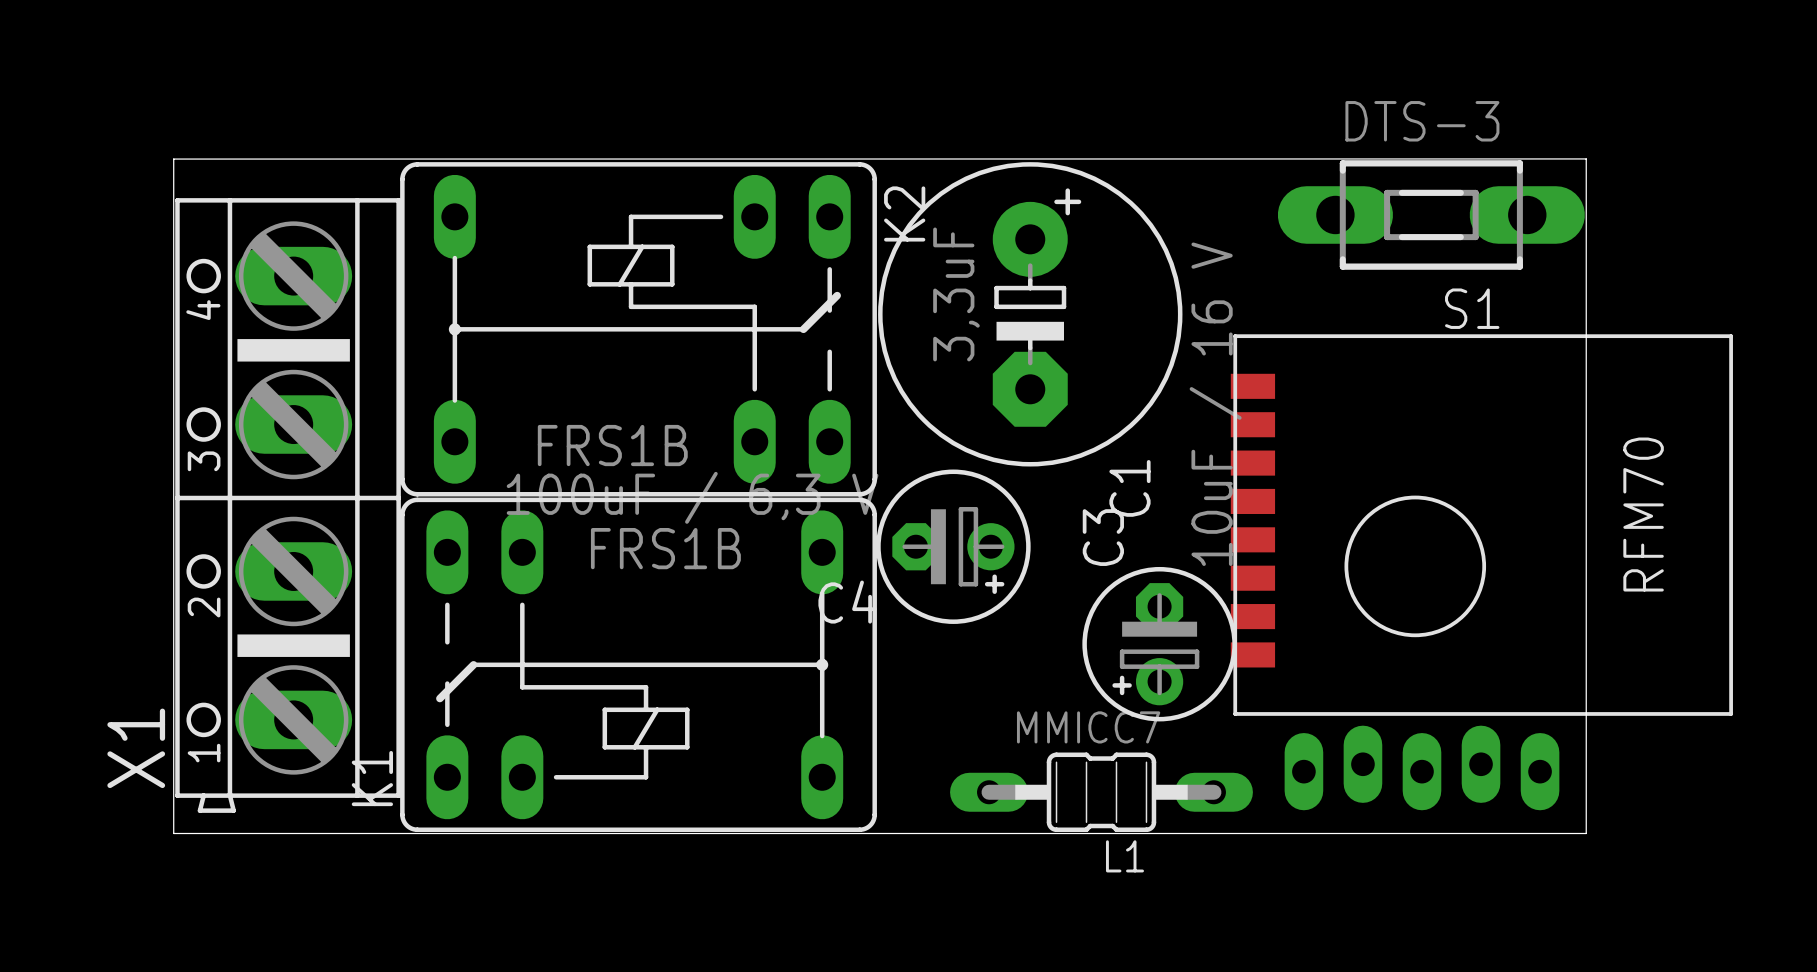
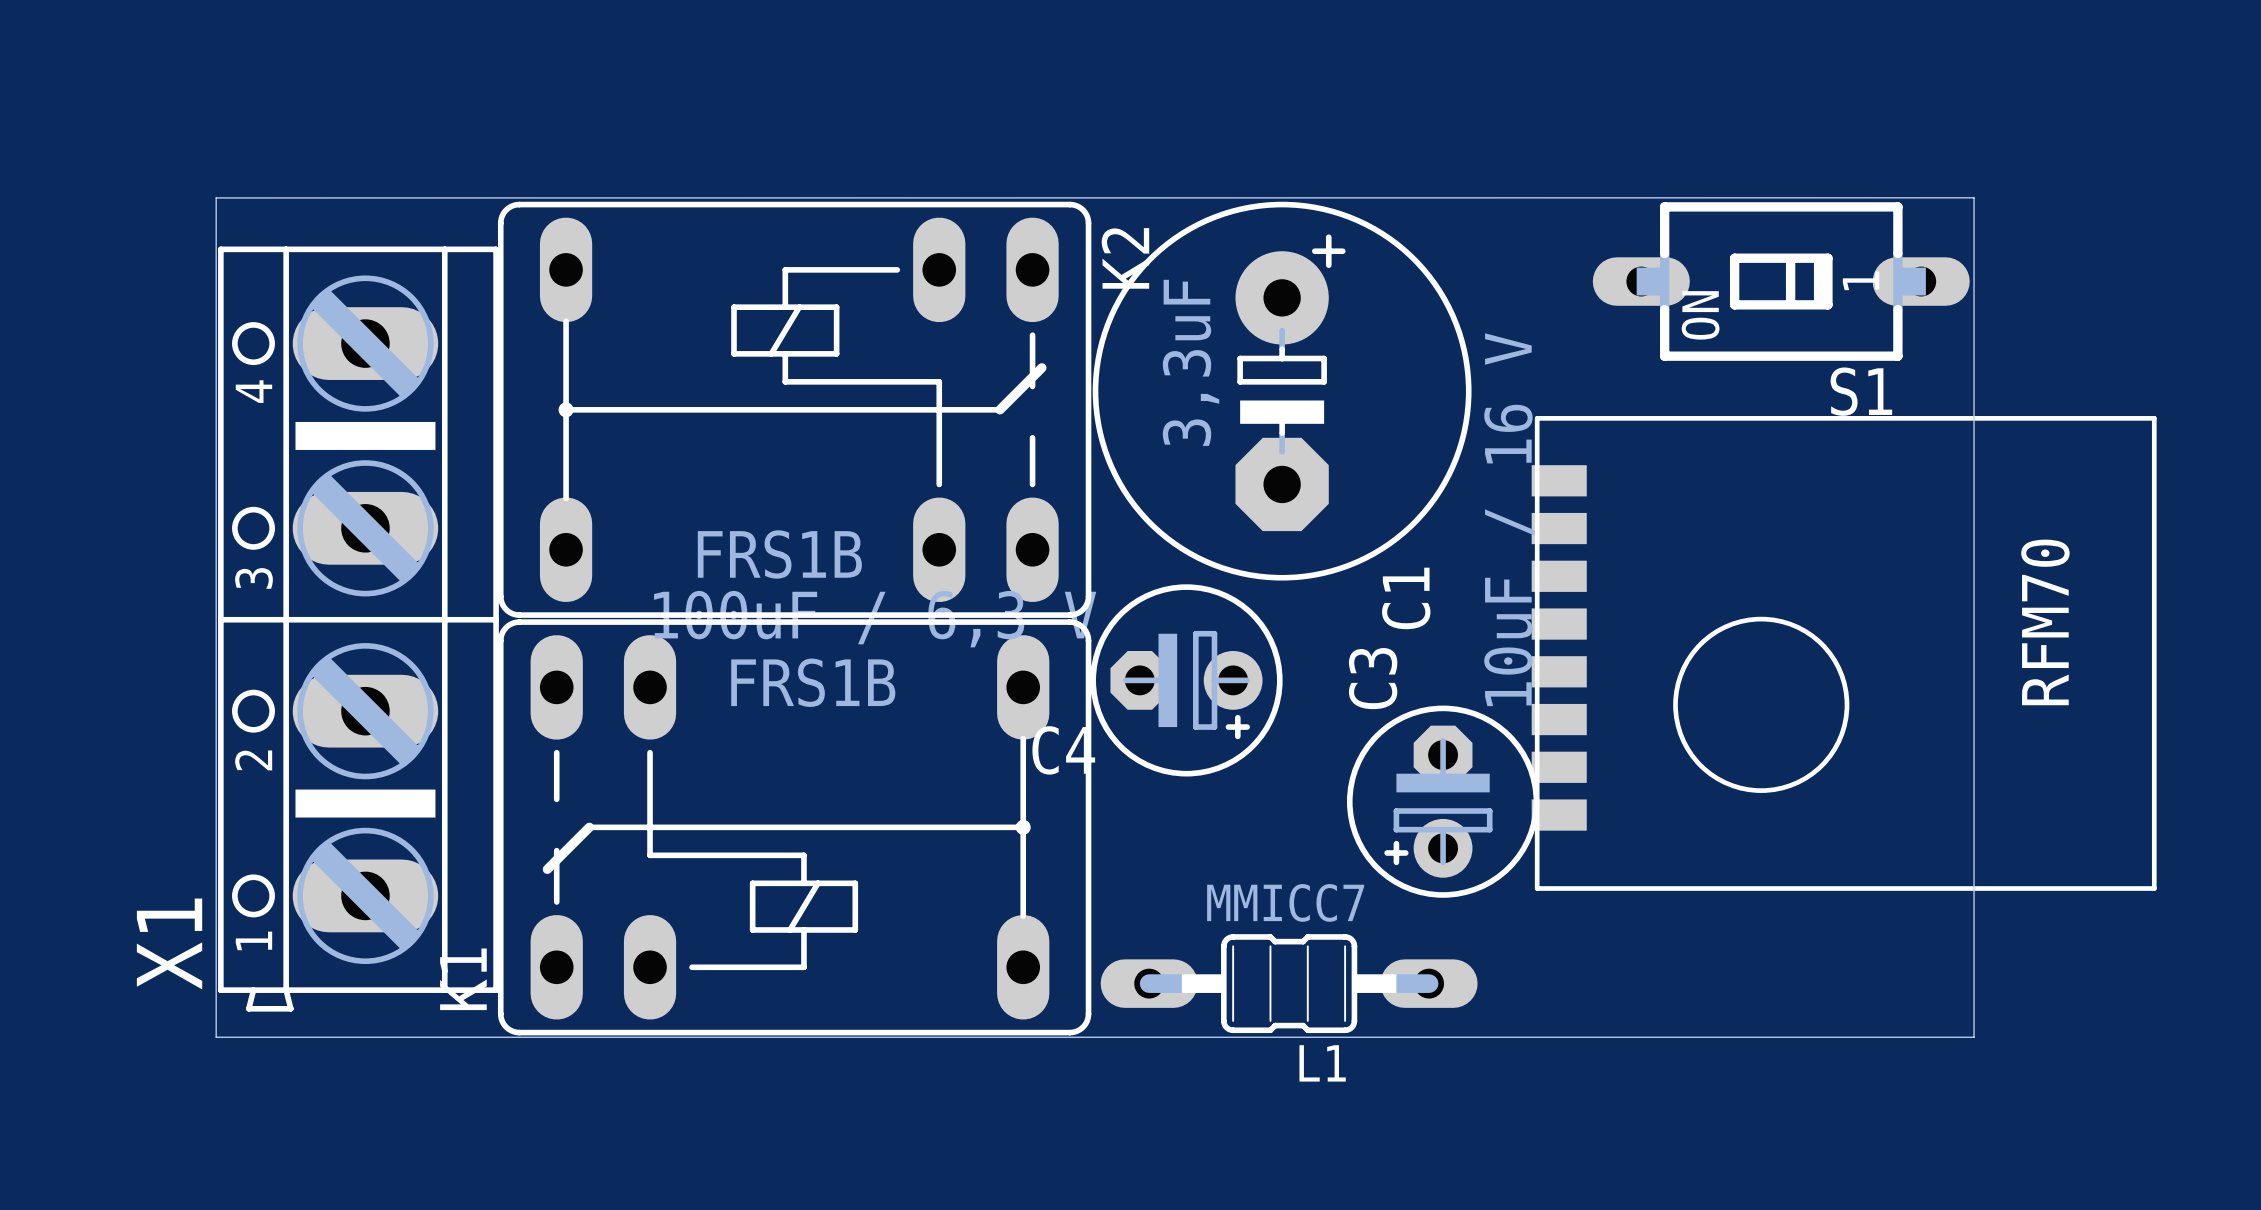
S1 value: DTS-3 (1422, 121) -> none
S1 footprint: [1277, 160, 1585, 270] -> [1592, 202, 1970, 361]
part: (1421, 767) -> none
L1 position: (1101, 792) -> (1289, 983)

